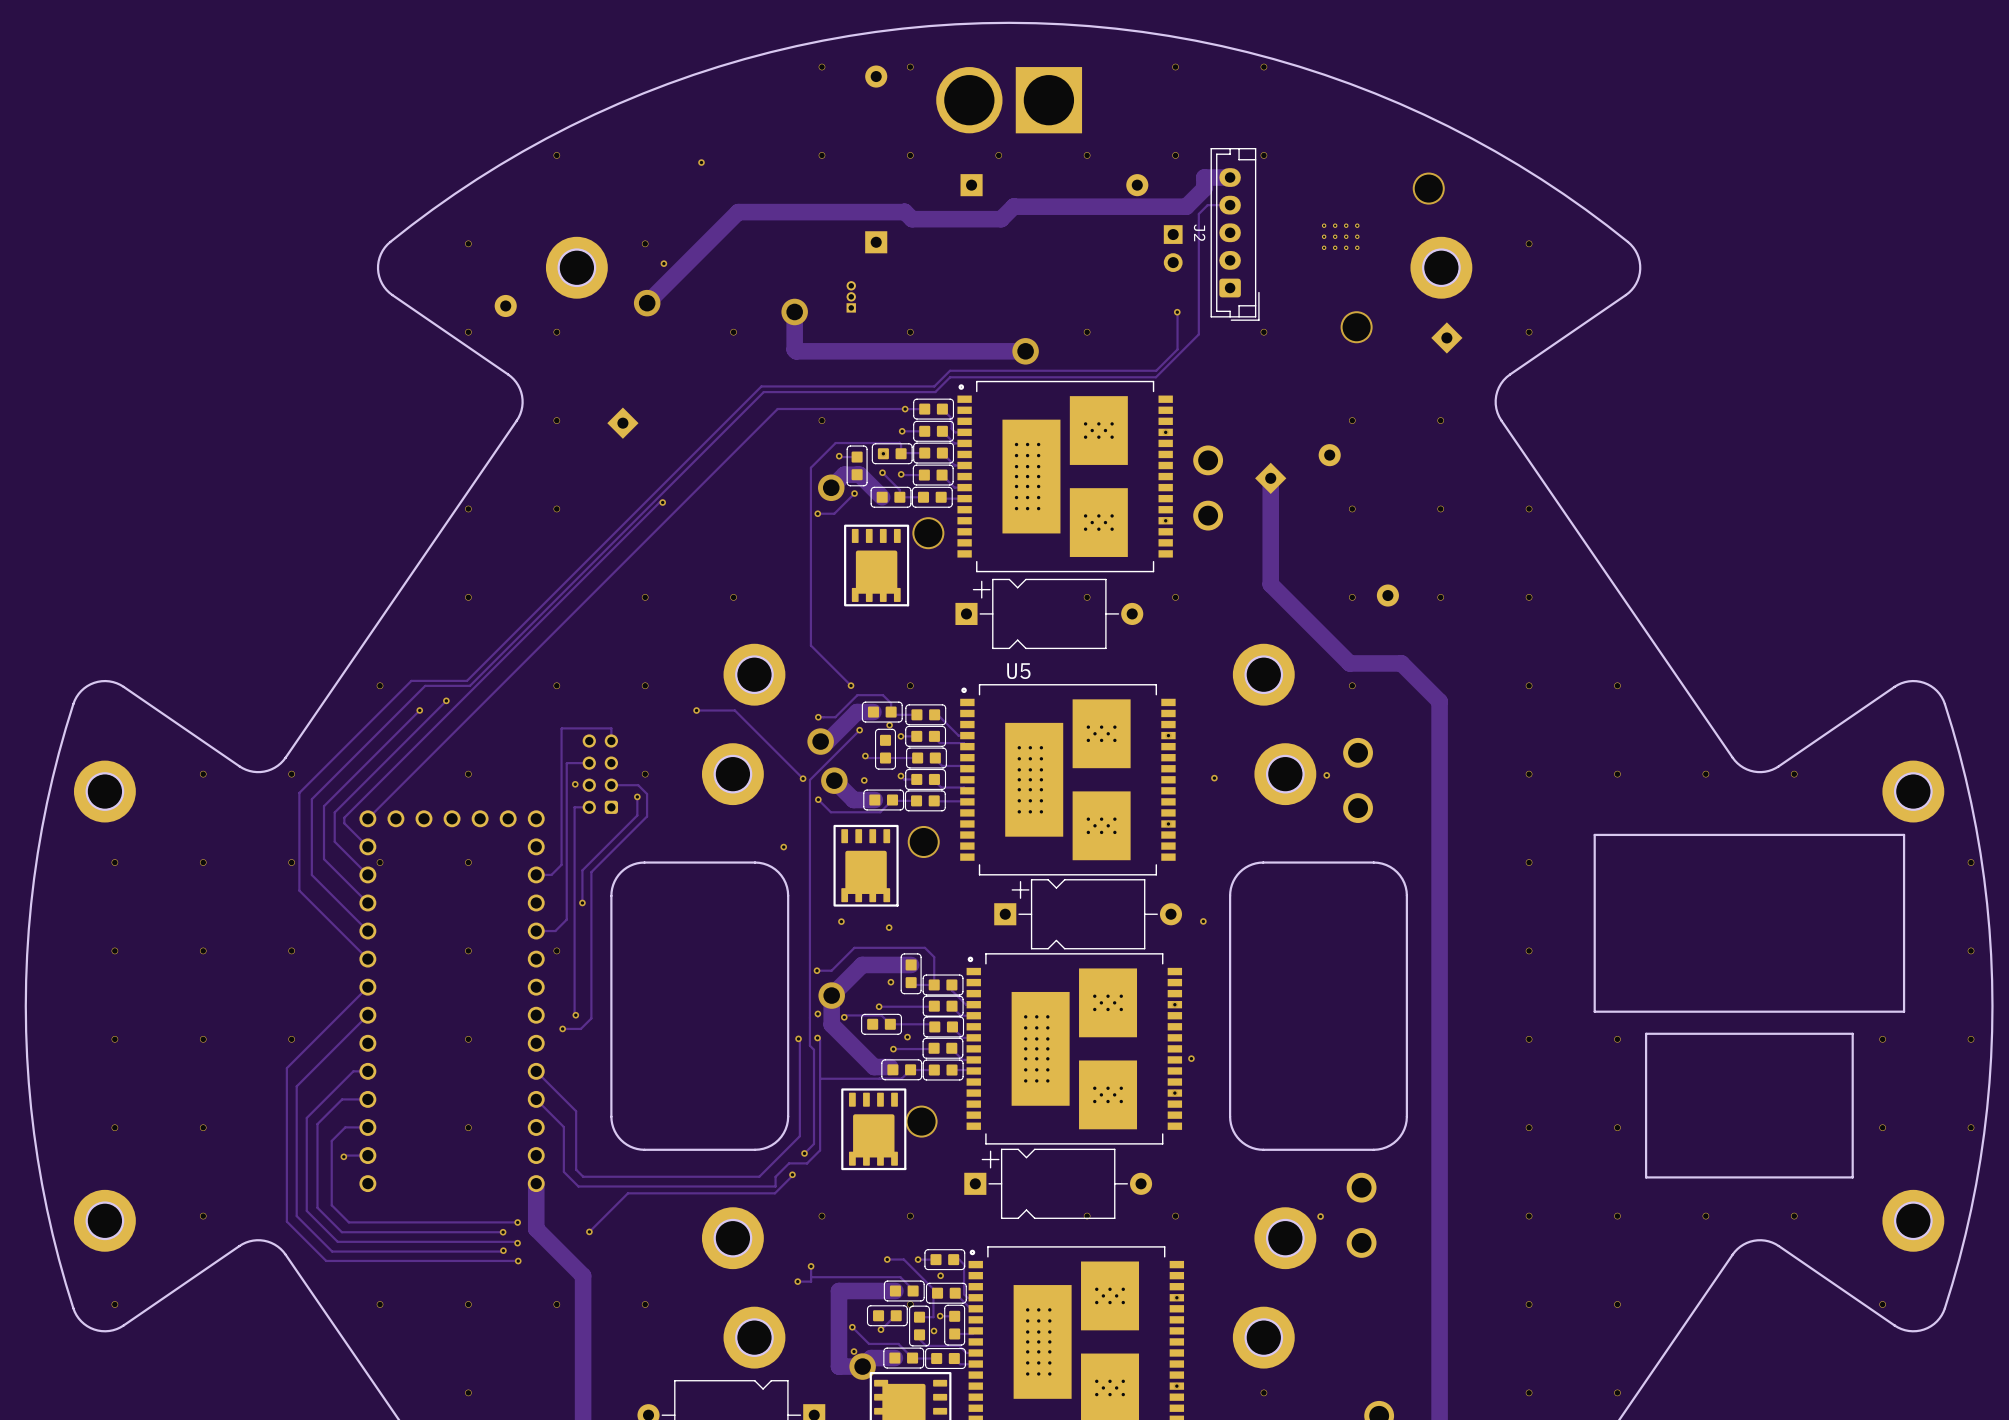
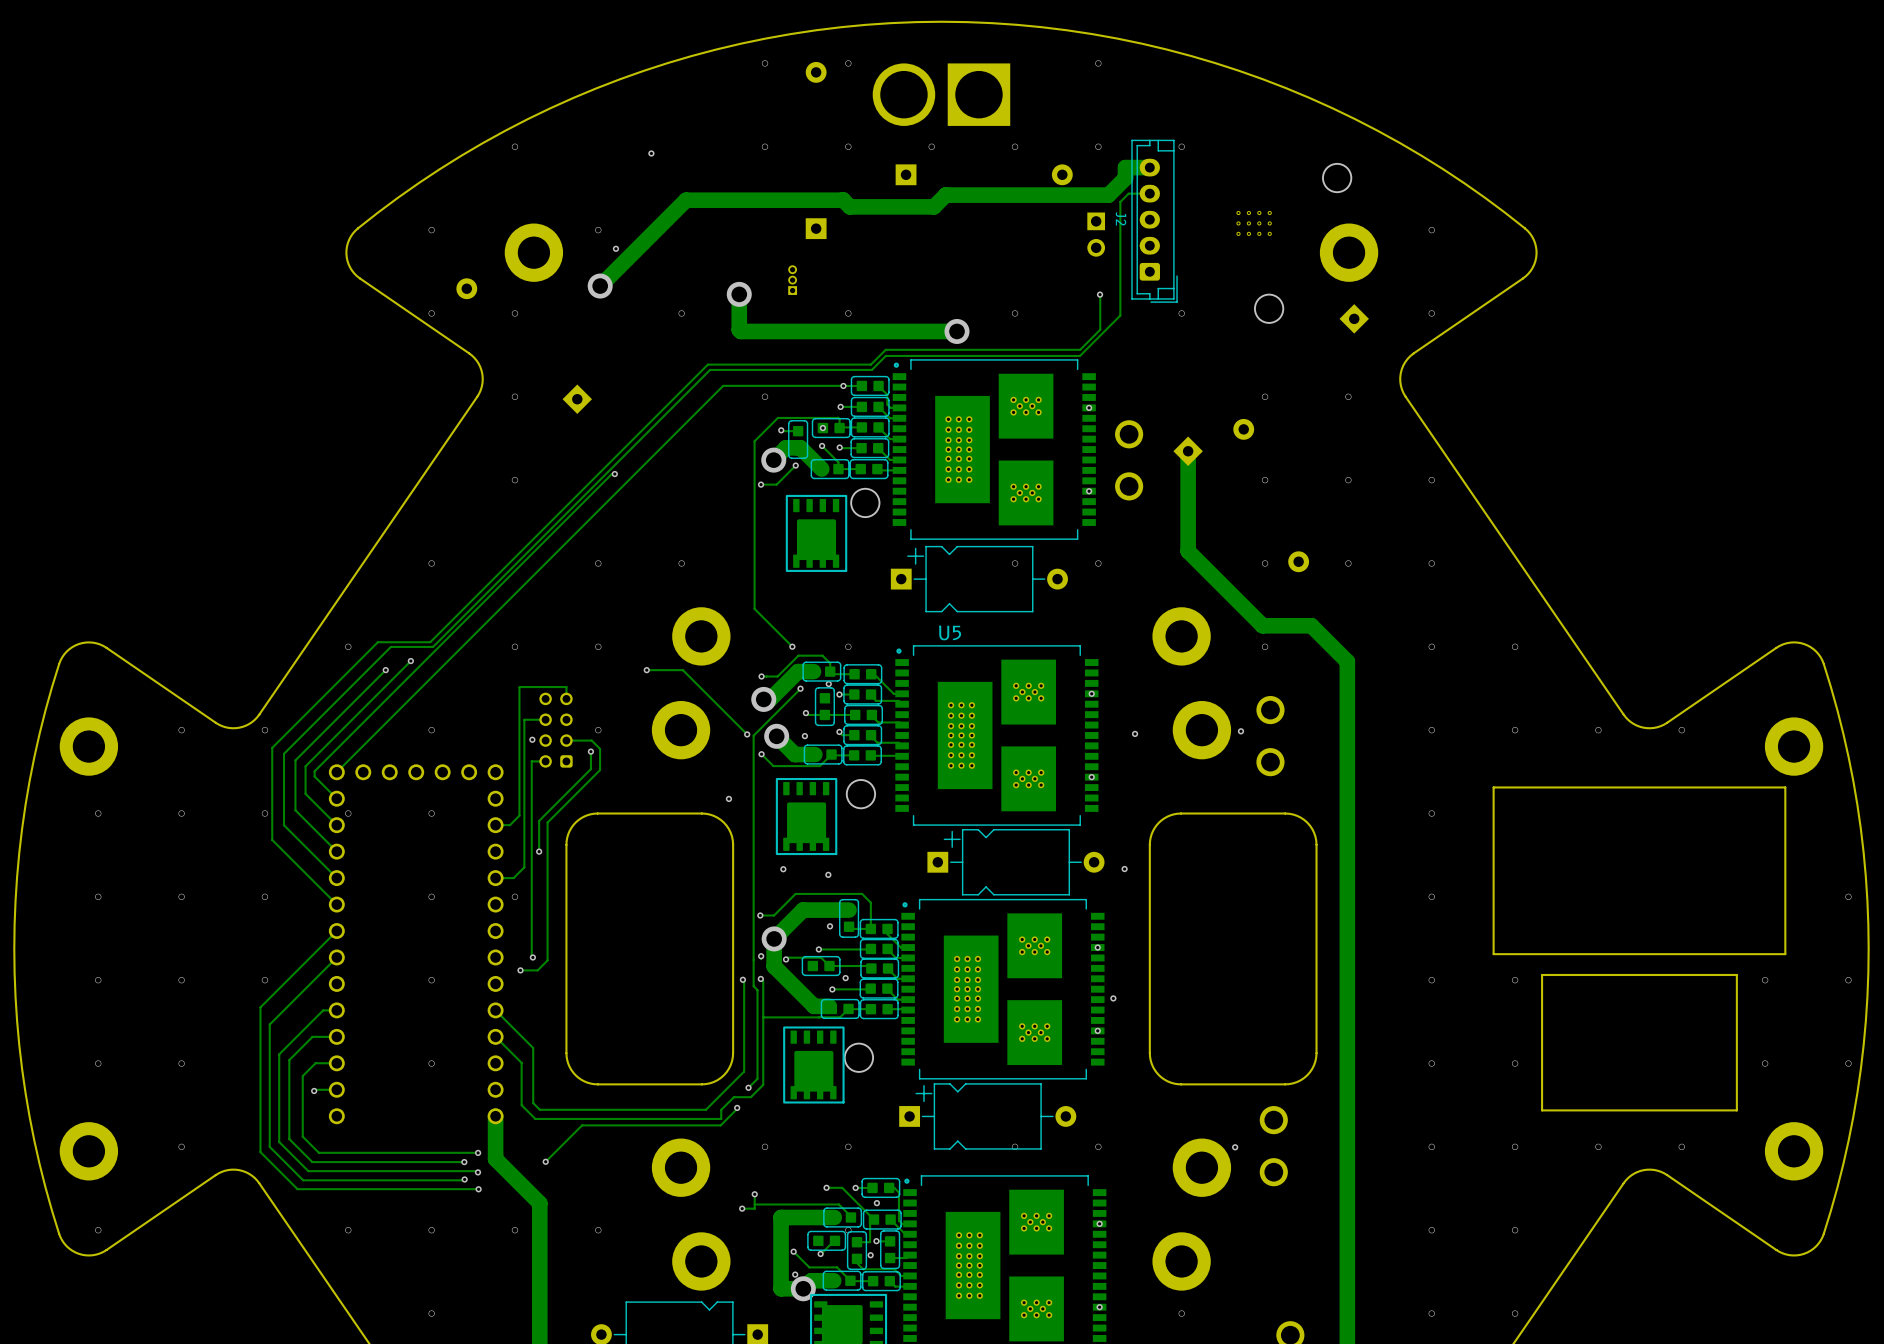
via: (1263, 67) -> none
via: (468, 508) -> none
via: (1971, 862) -> none
via: (1882, 1304) -> none

